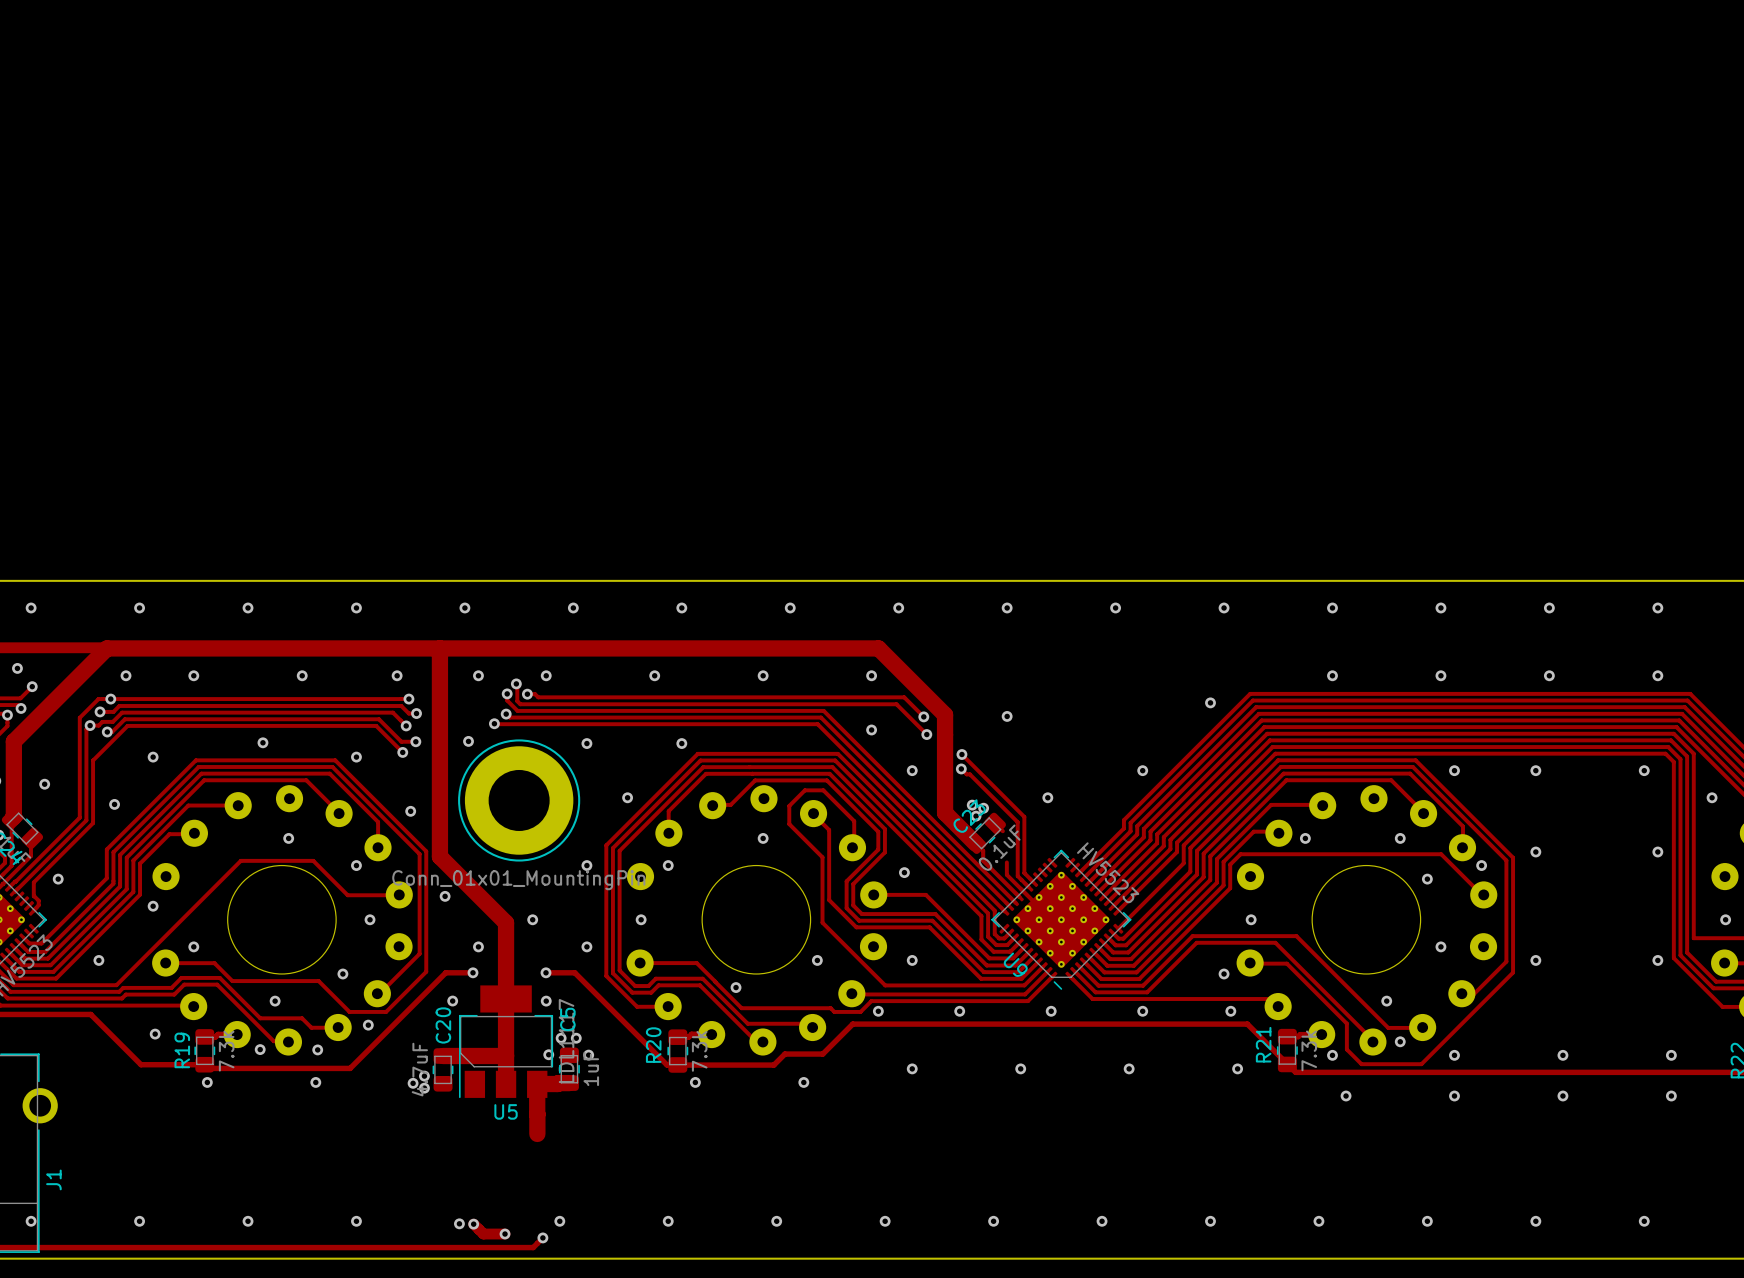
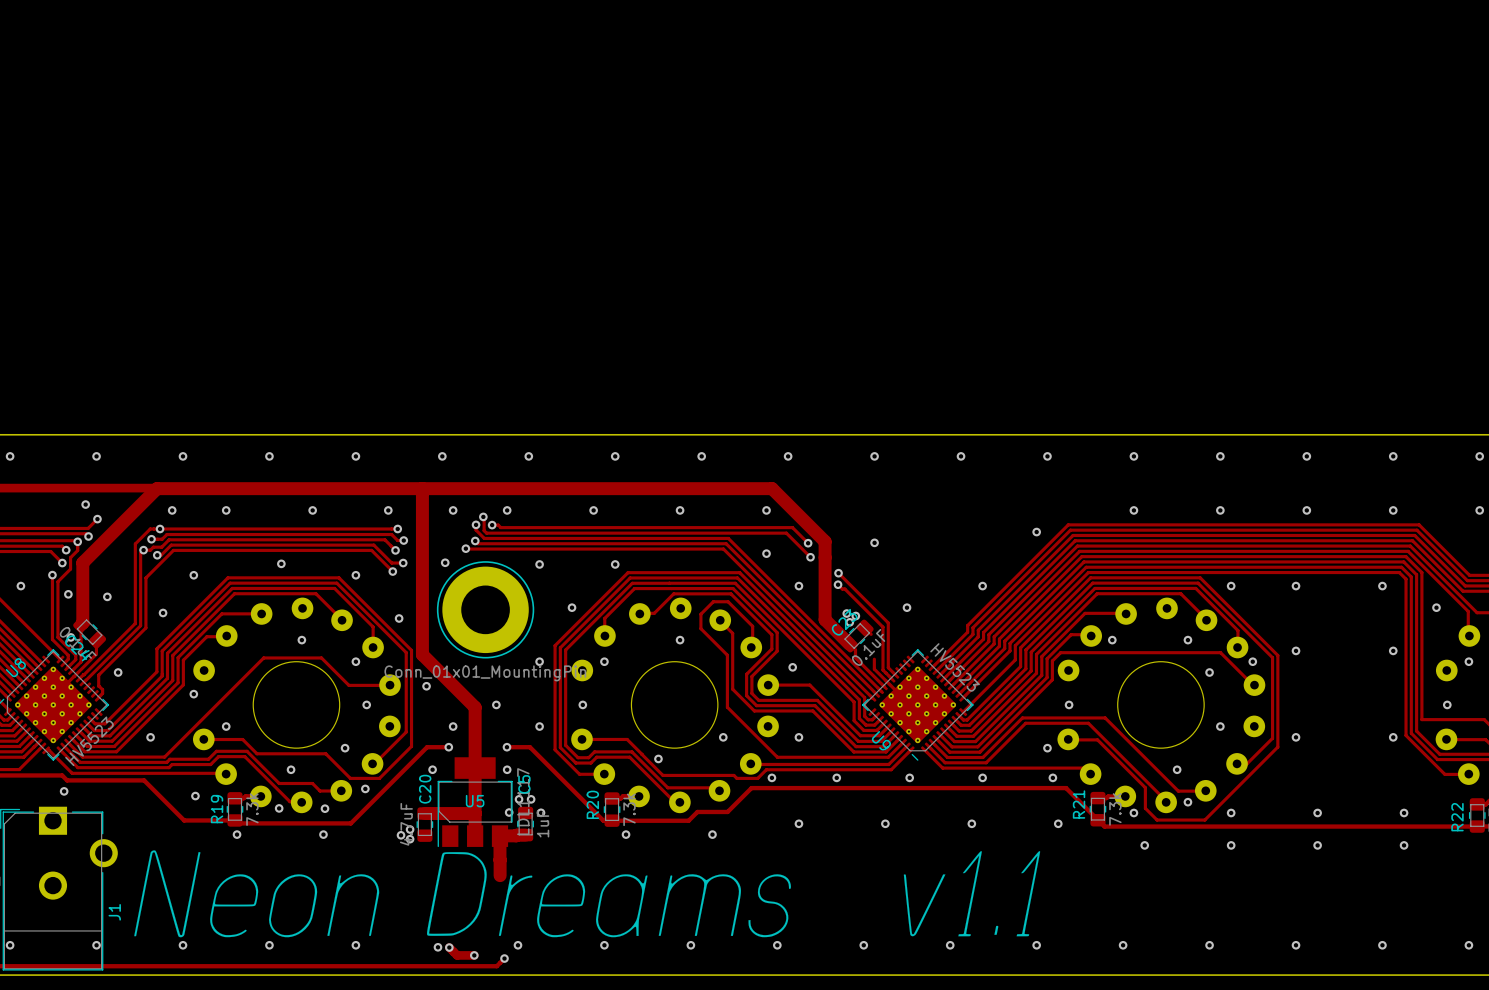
drawing: none -> [134, 850, 791, 938]
drawing: none -> [903, 851, 1041, 937]
U5 name position: U5 (506, 1111) -> U5 (475, 801)

